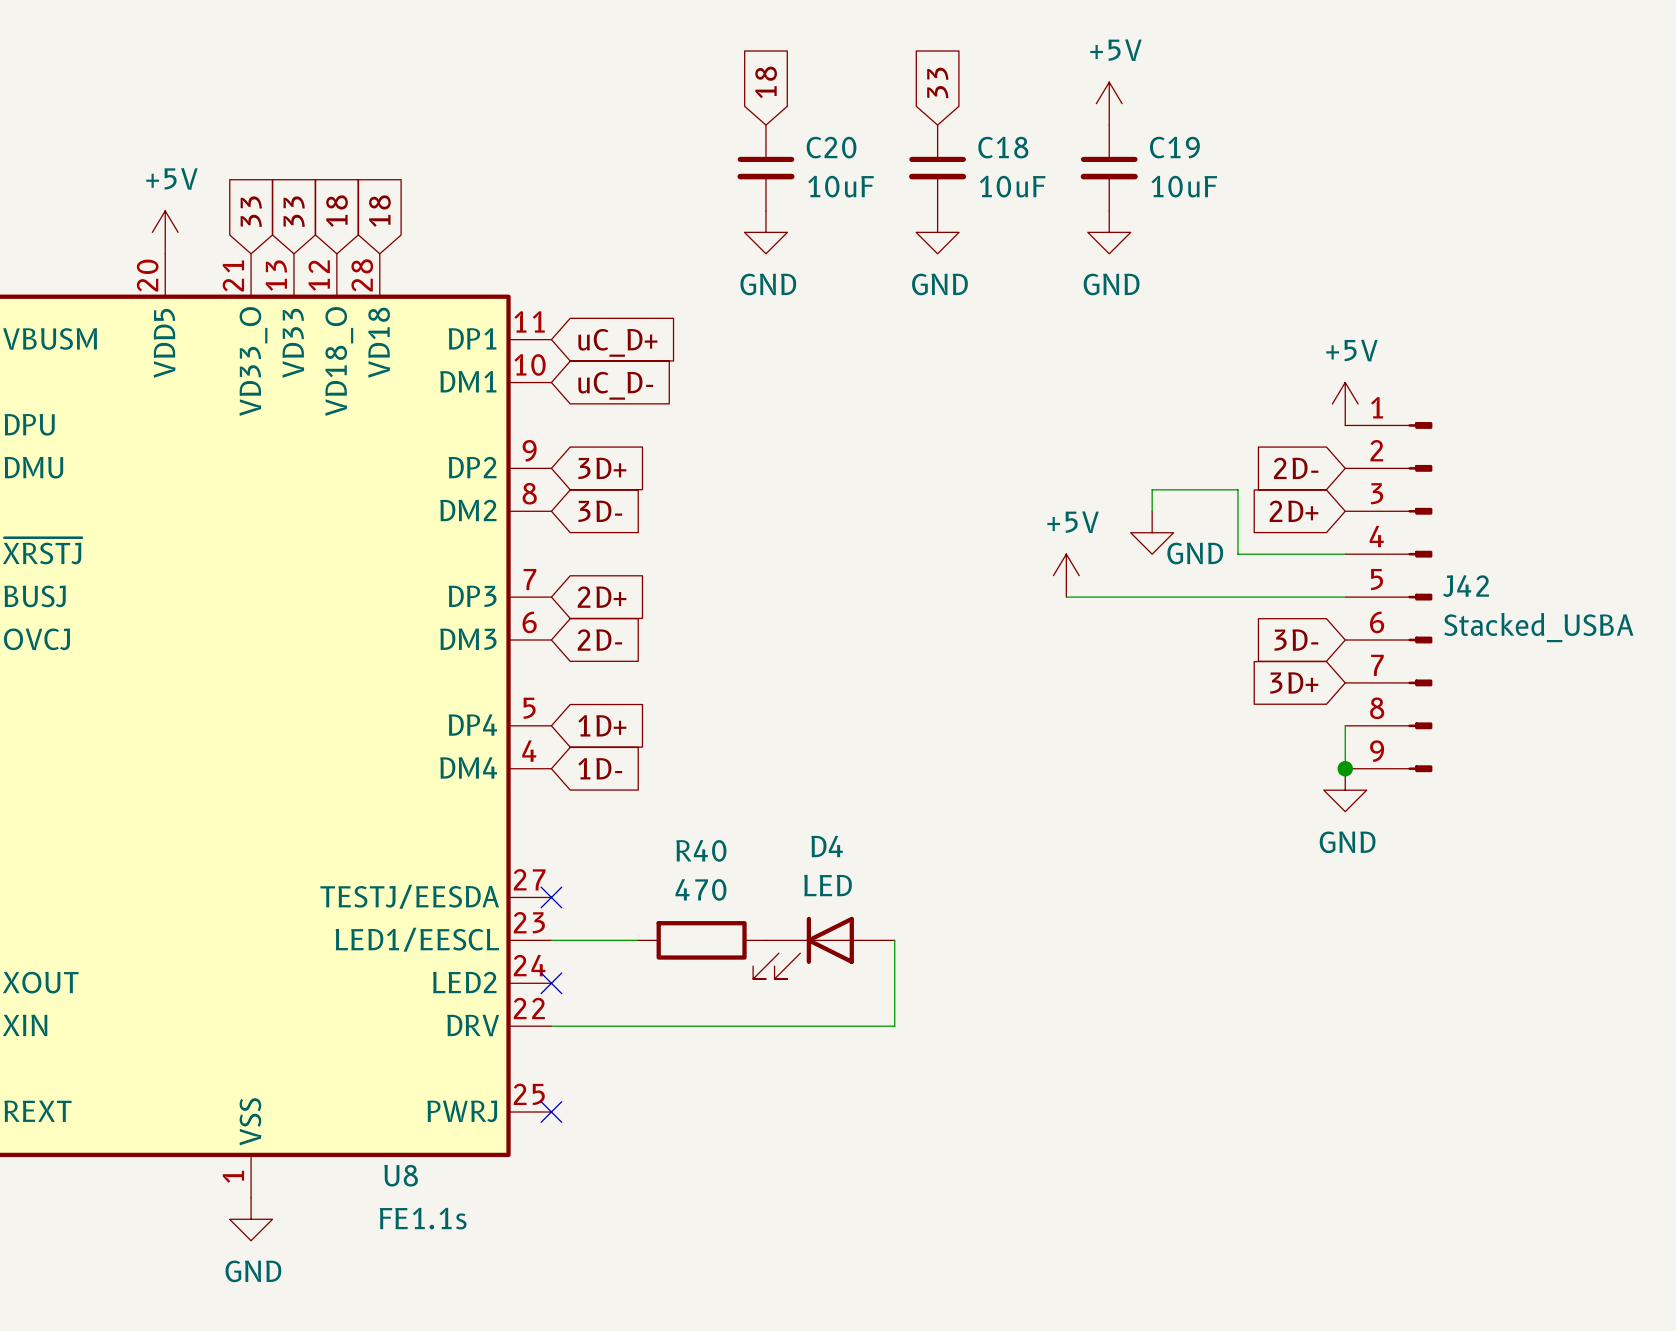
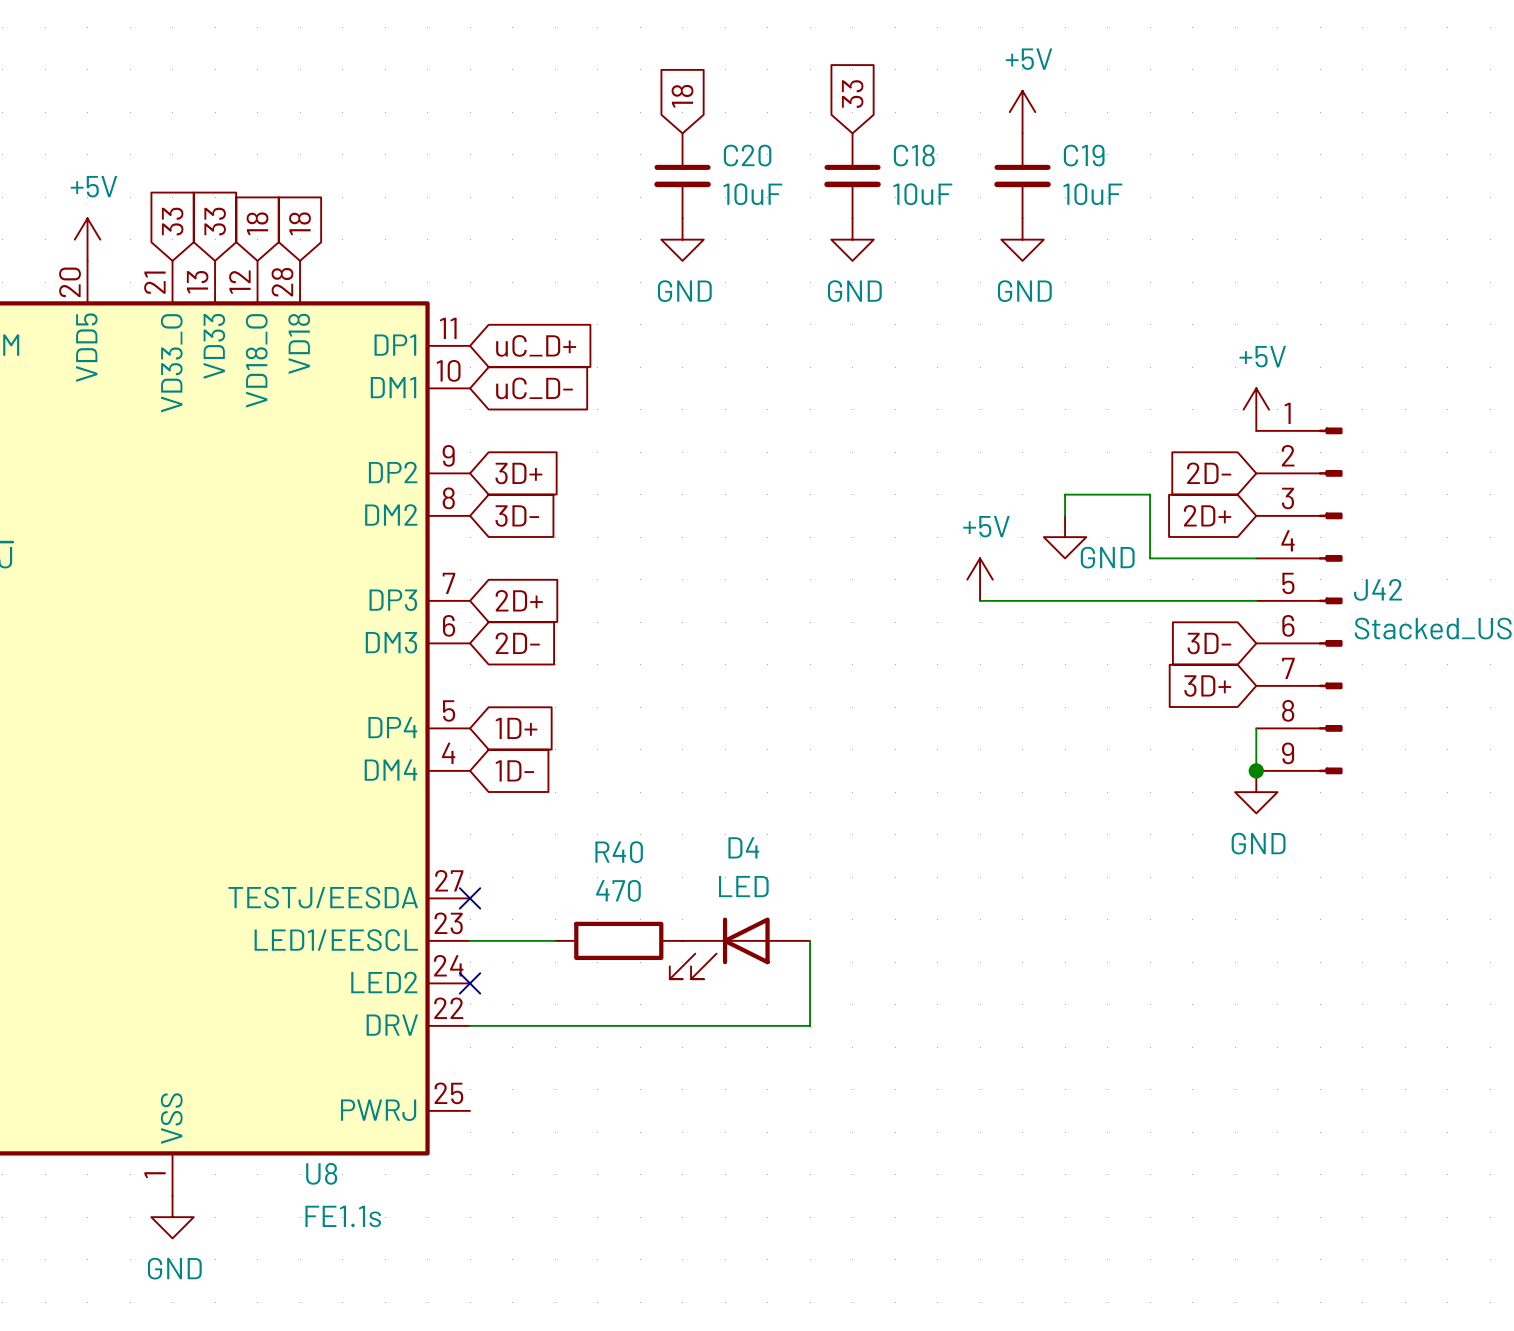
no-connect mark: (551, 1112) -> none

